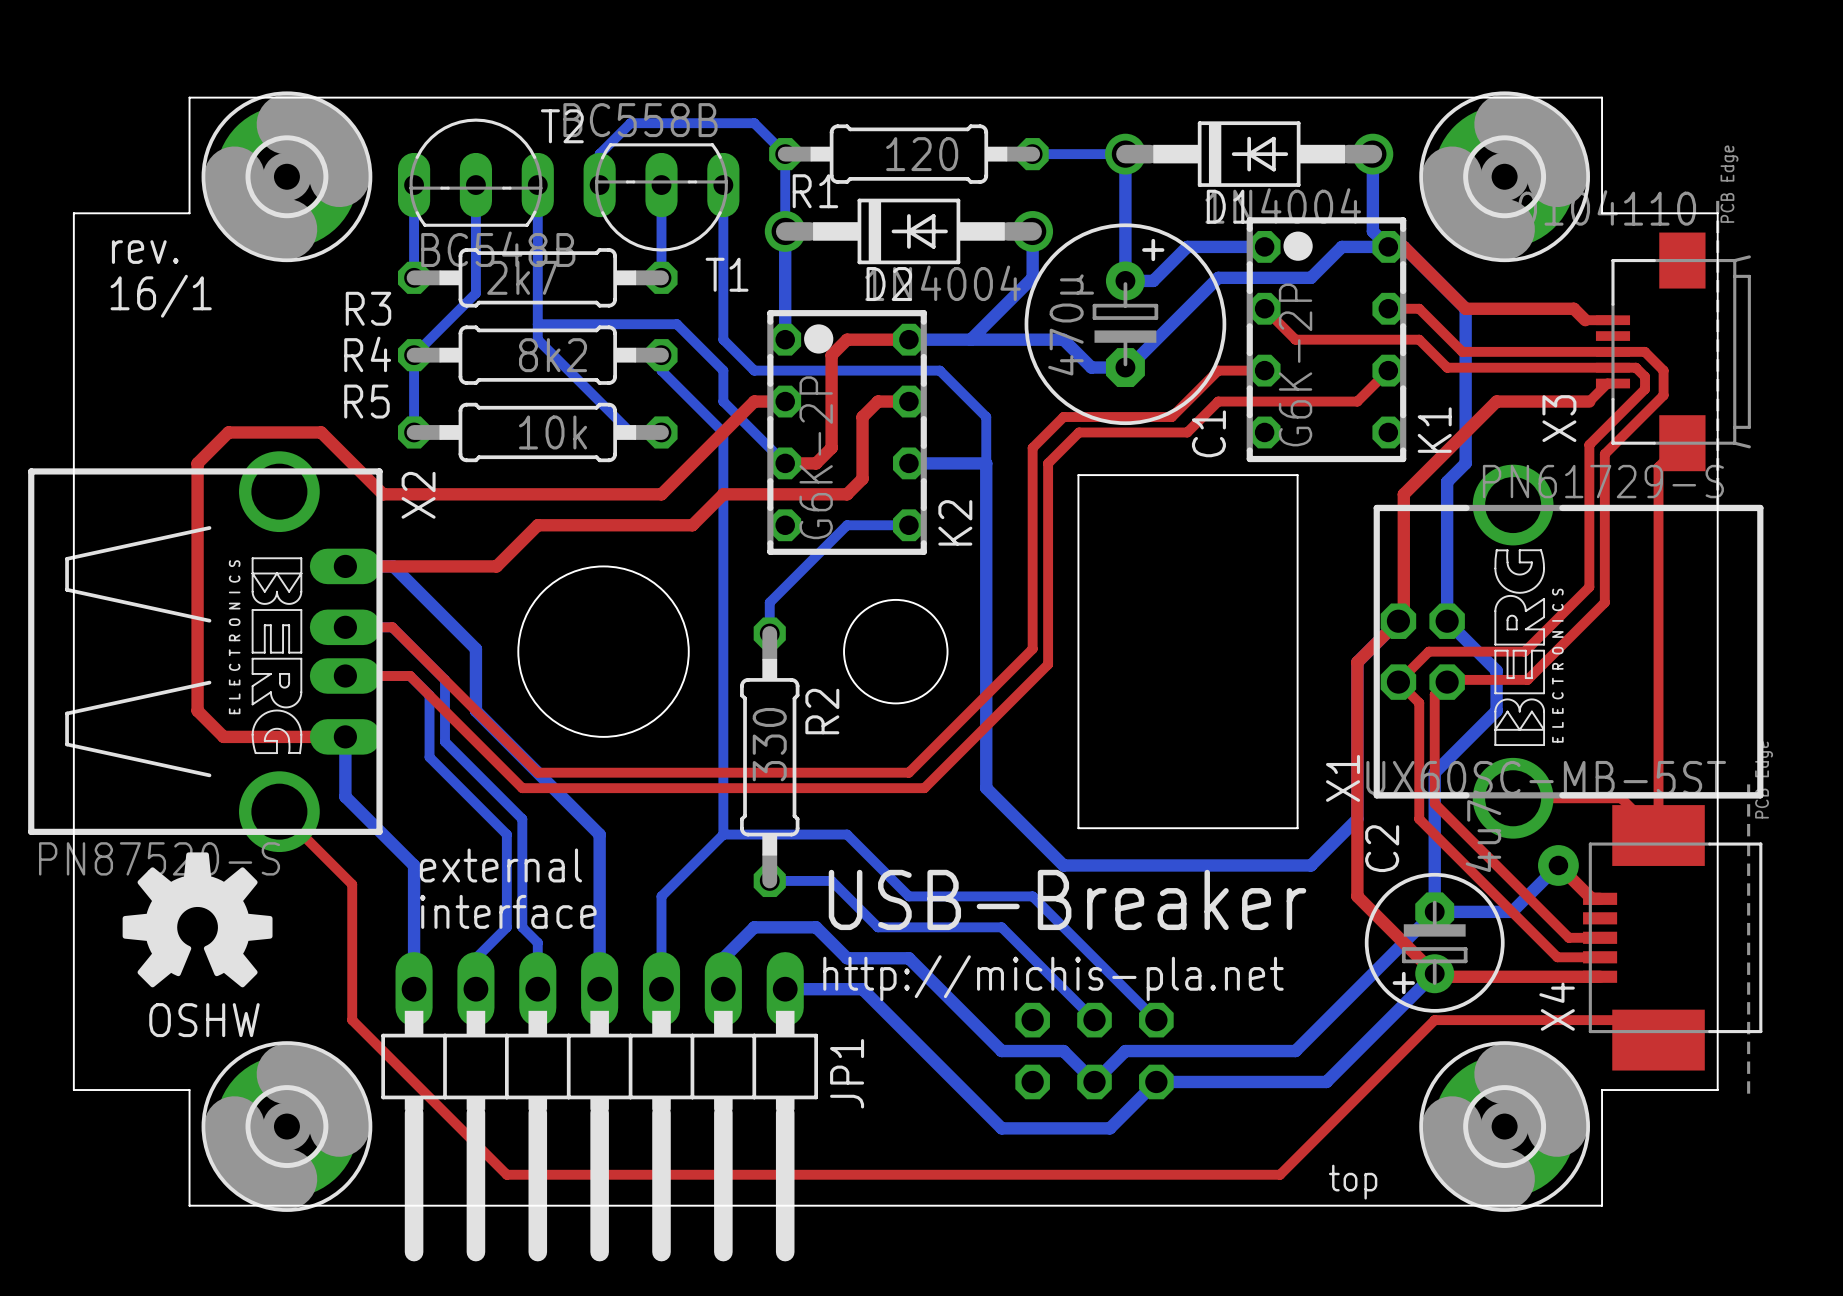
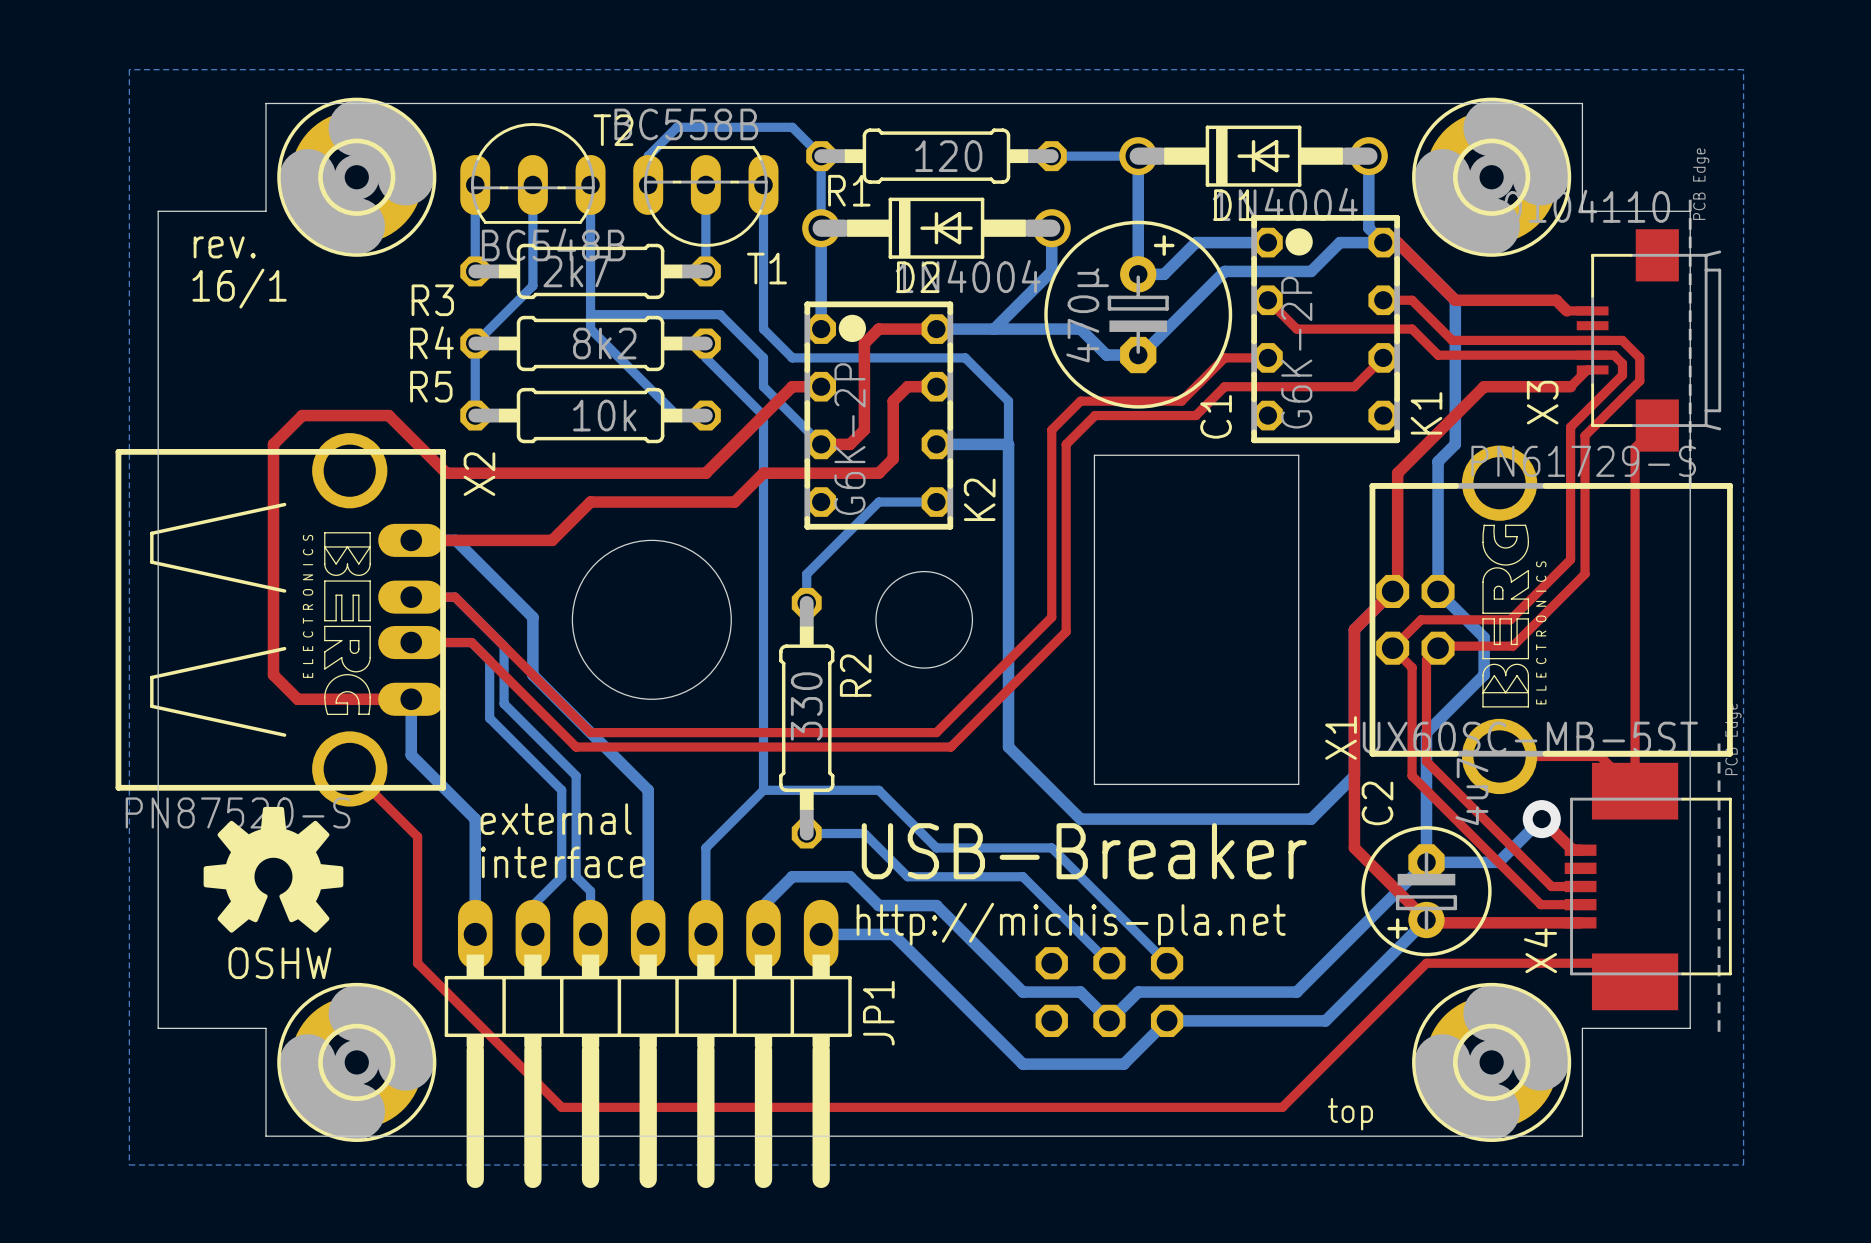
bottom zone outline: none -> (129, 69) (1743, 69) (1743, 1165) (129, 1165) (129, 69)

